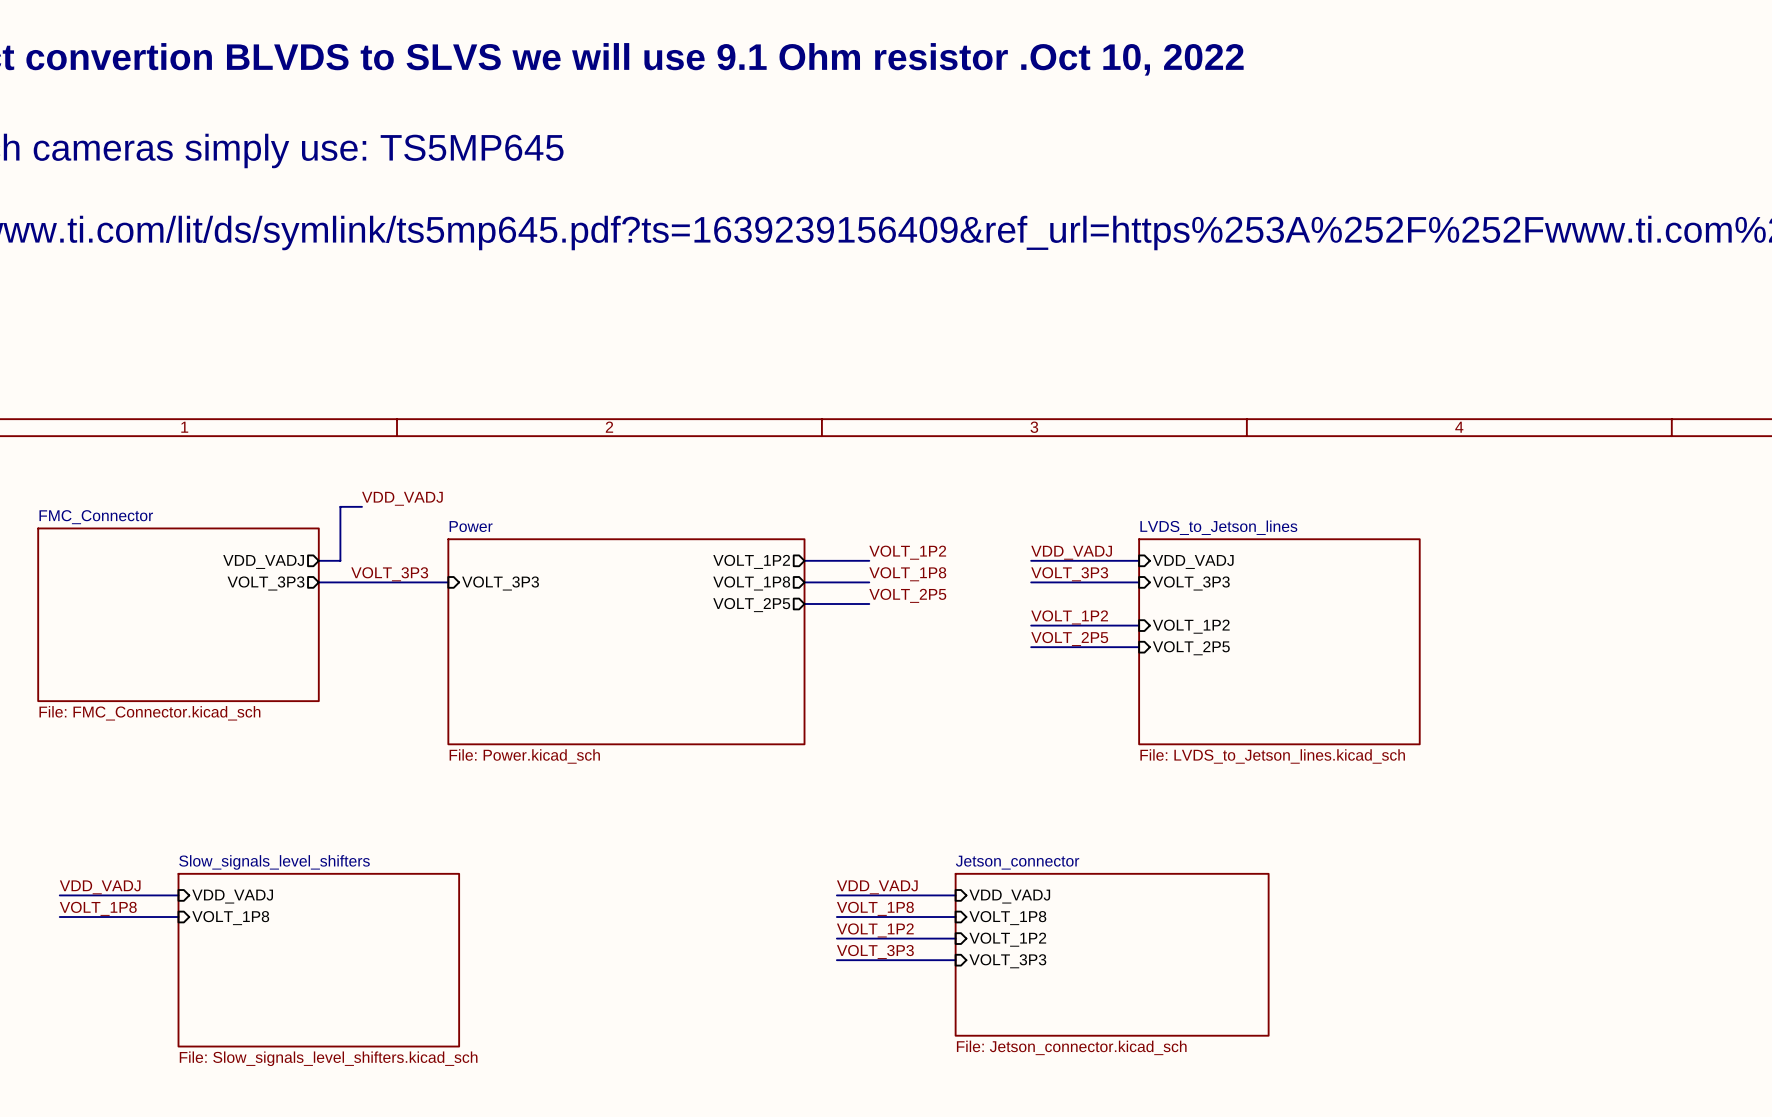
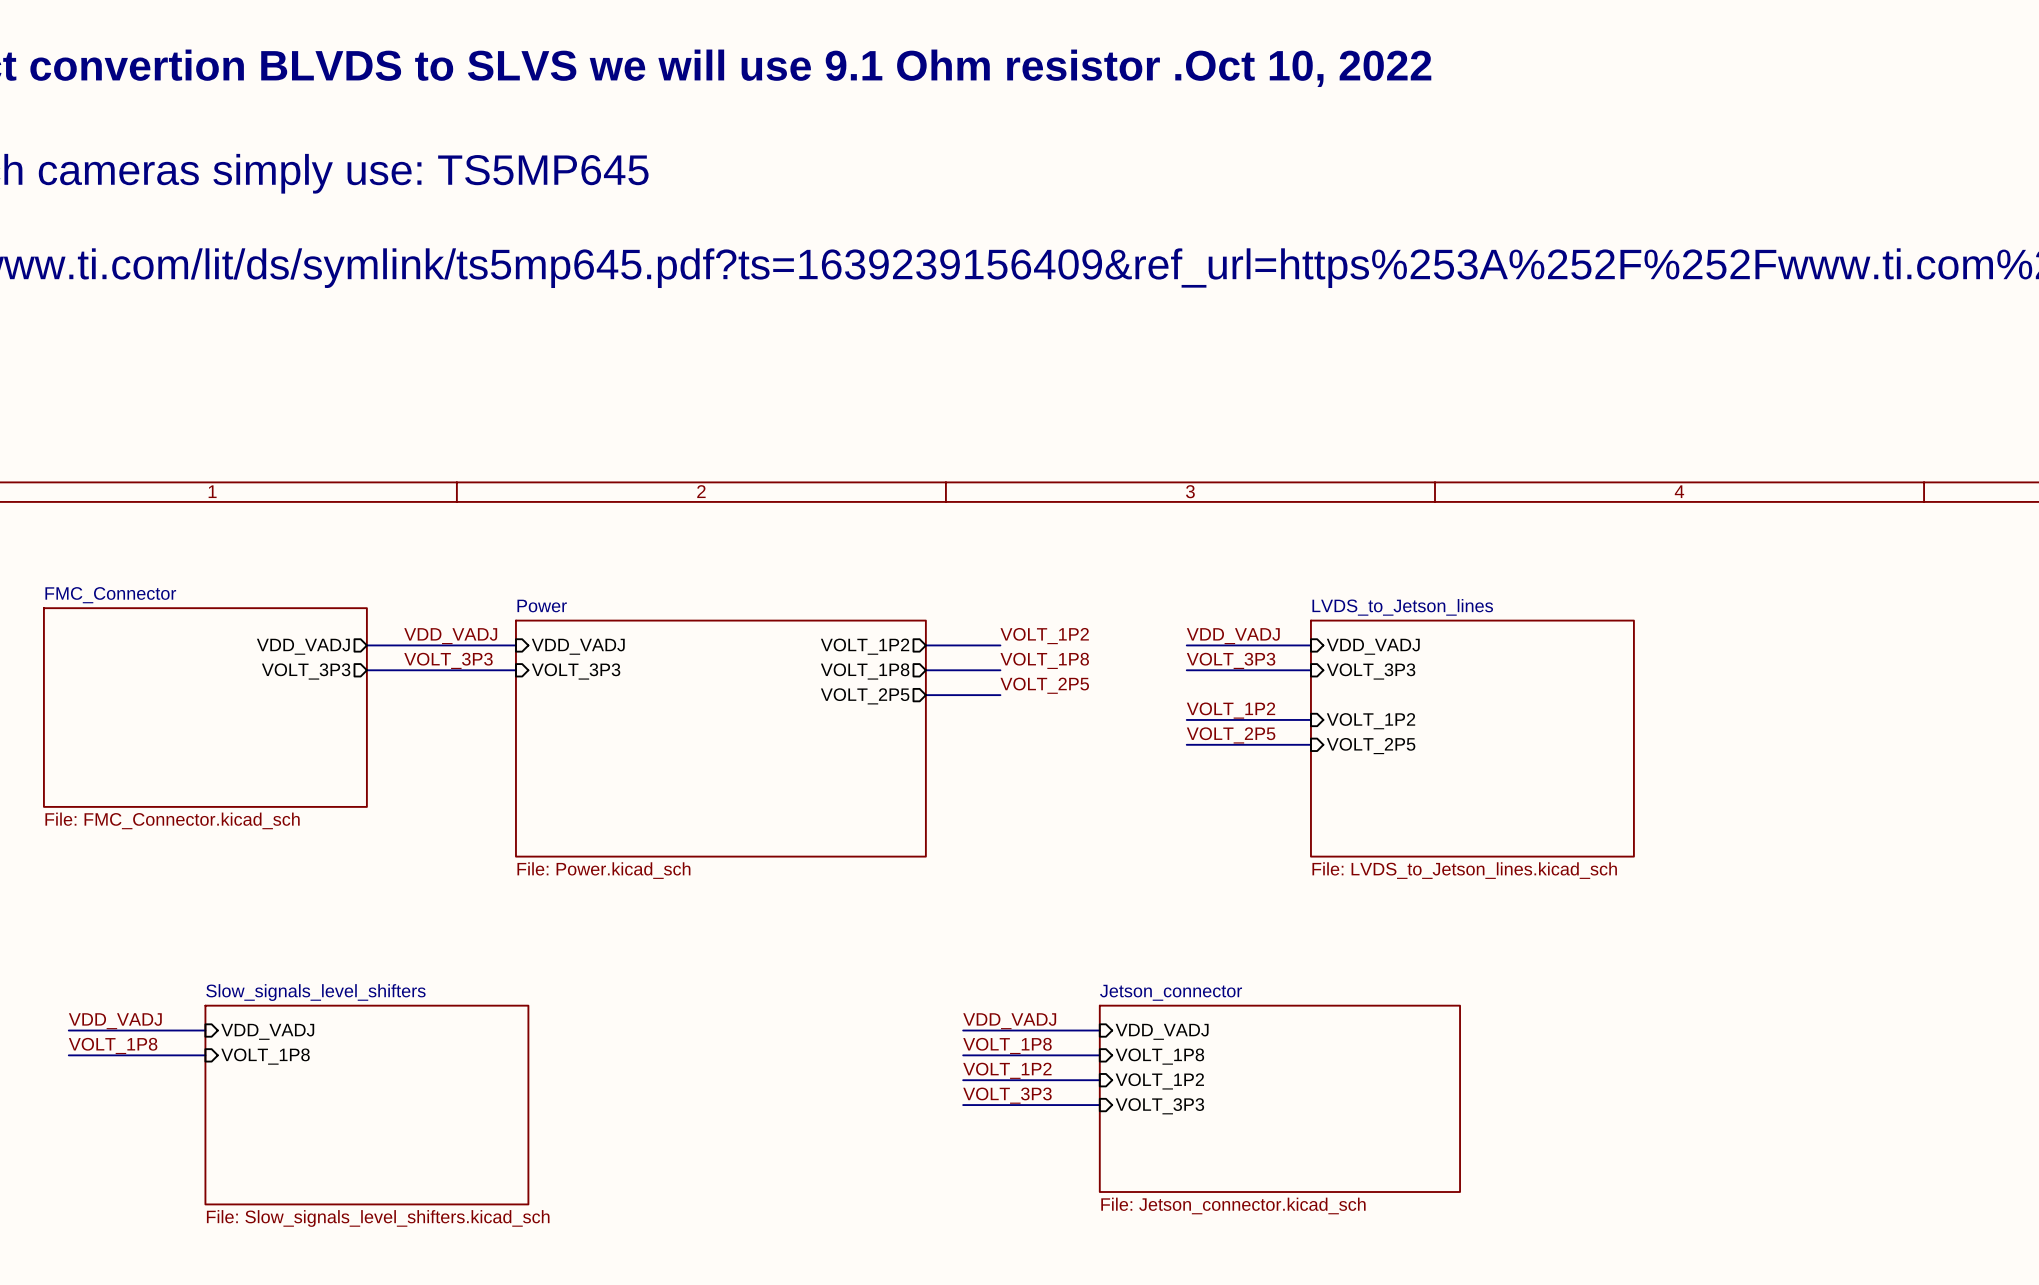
label position: VDD_VADJ (402, 498) -> VDD_VADJ (450, 636)
wire: (361, 506) (340, 506) (340, 560) -> (515, 645) (391, 645)
sheet pin: none -> VDD_VADJ (578, 646)

